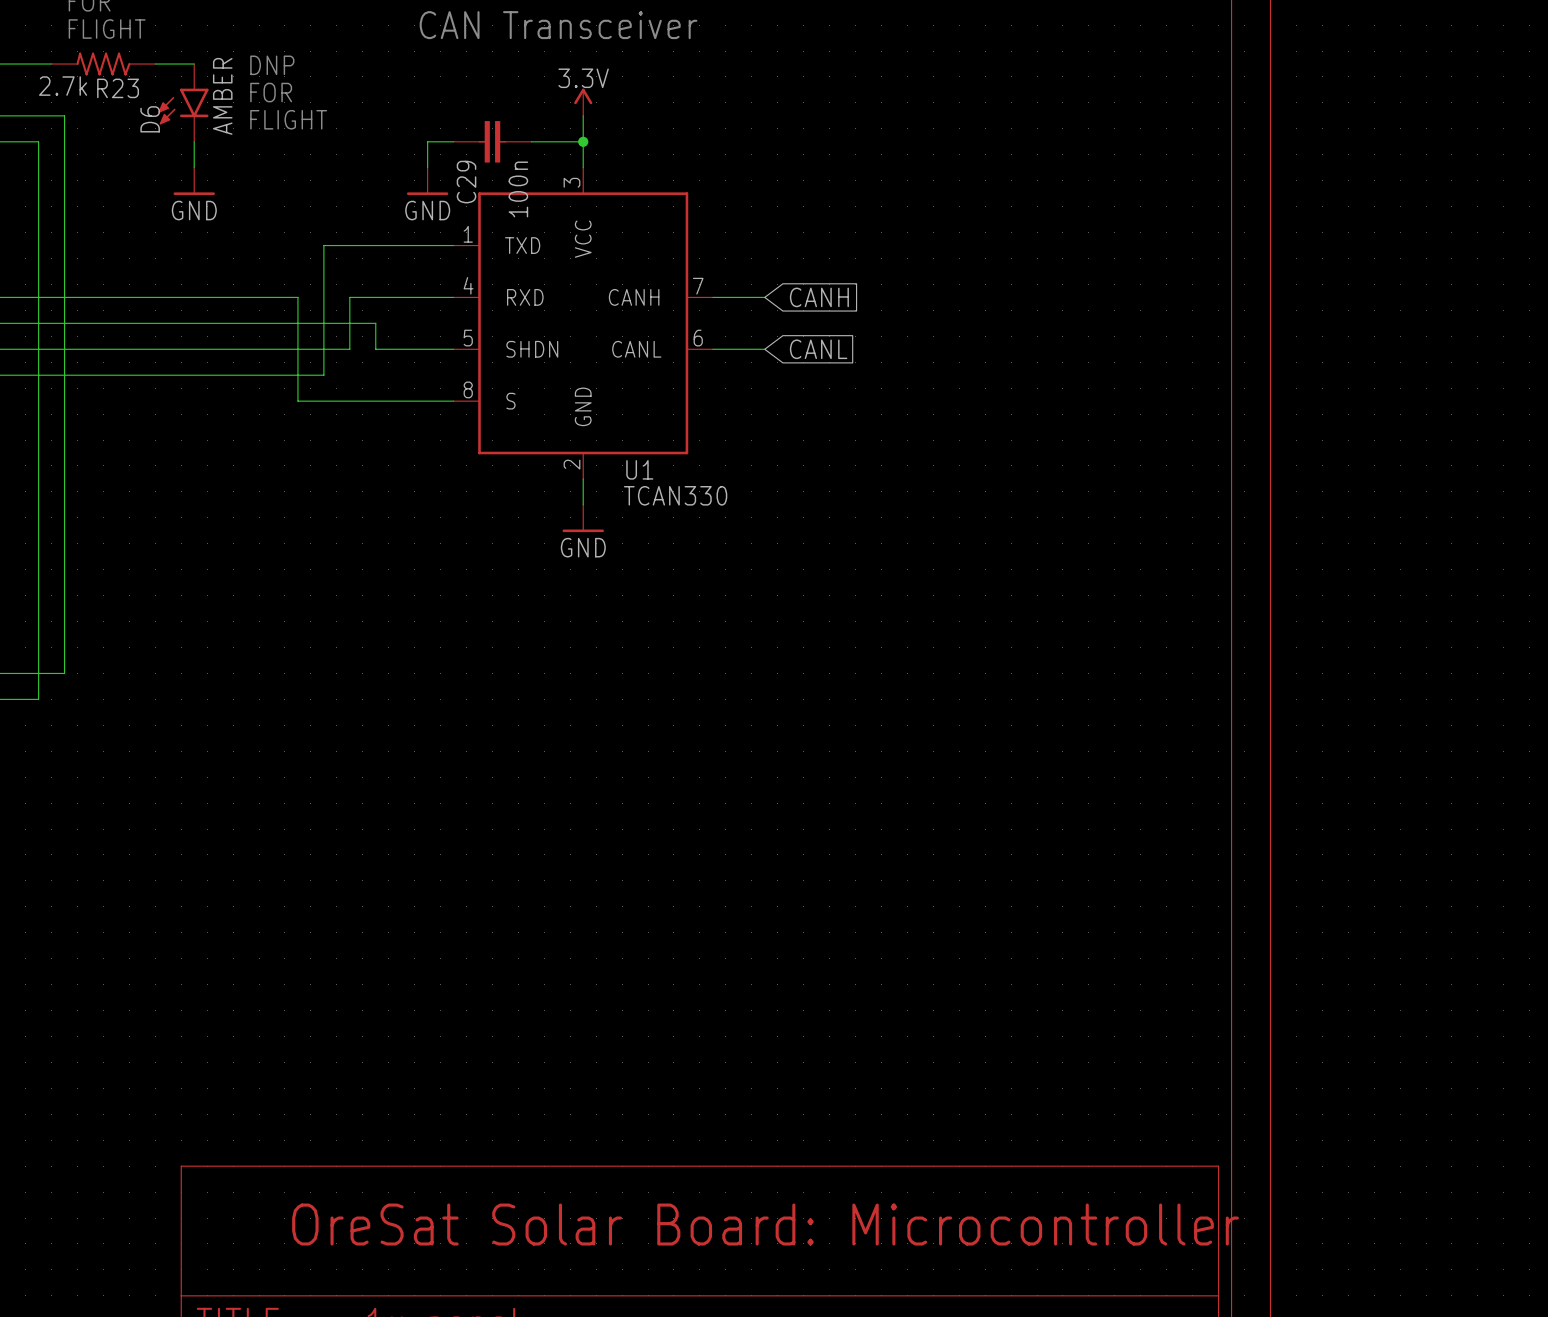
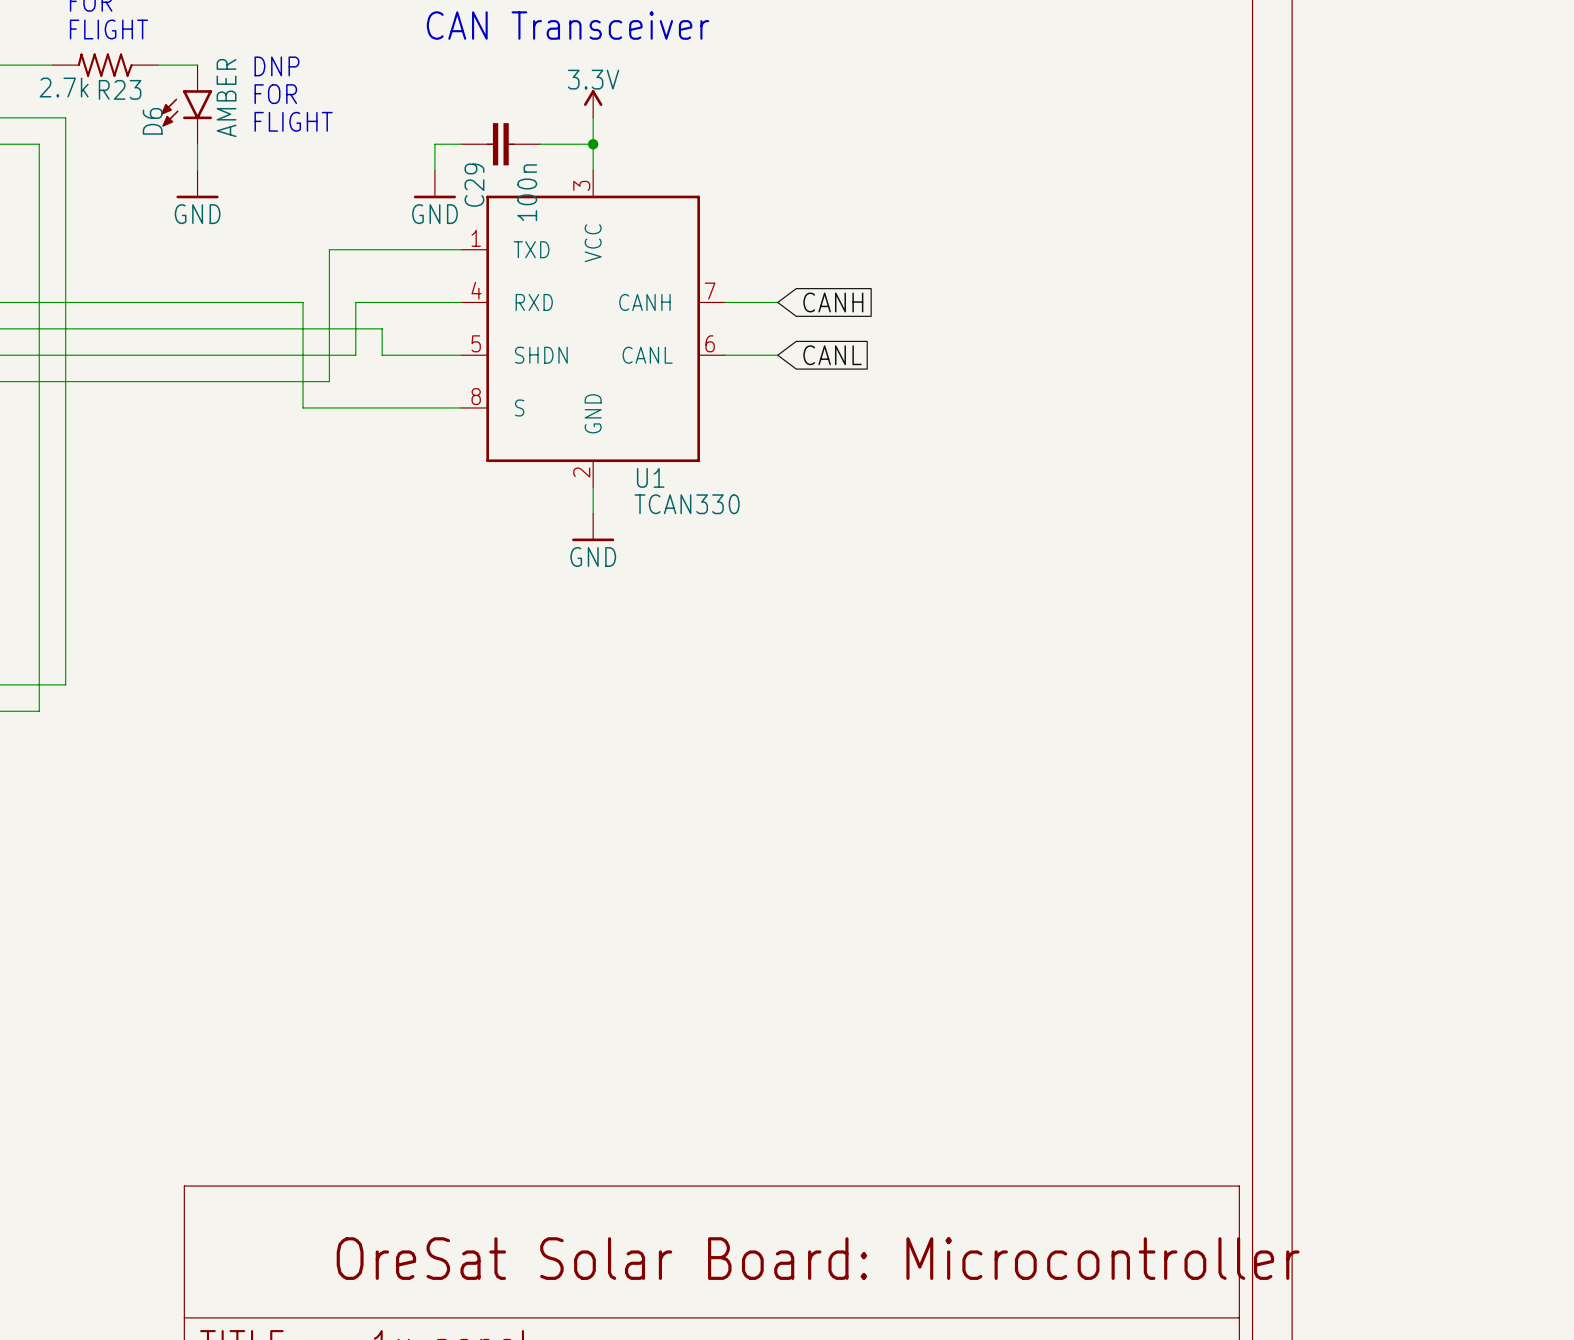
text position: OreSat Solar Board: Microcontroller (765, 1224) -> OreSat Solar Board: Microcontroller (818, 1258)

